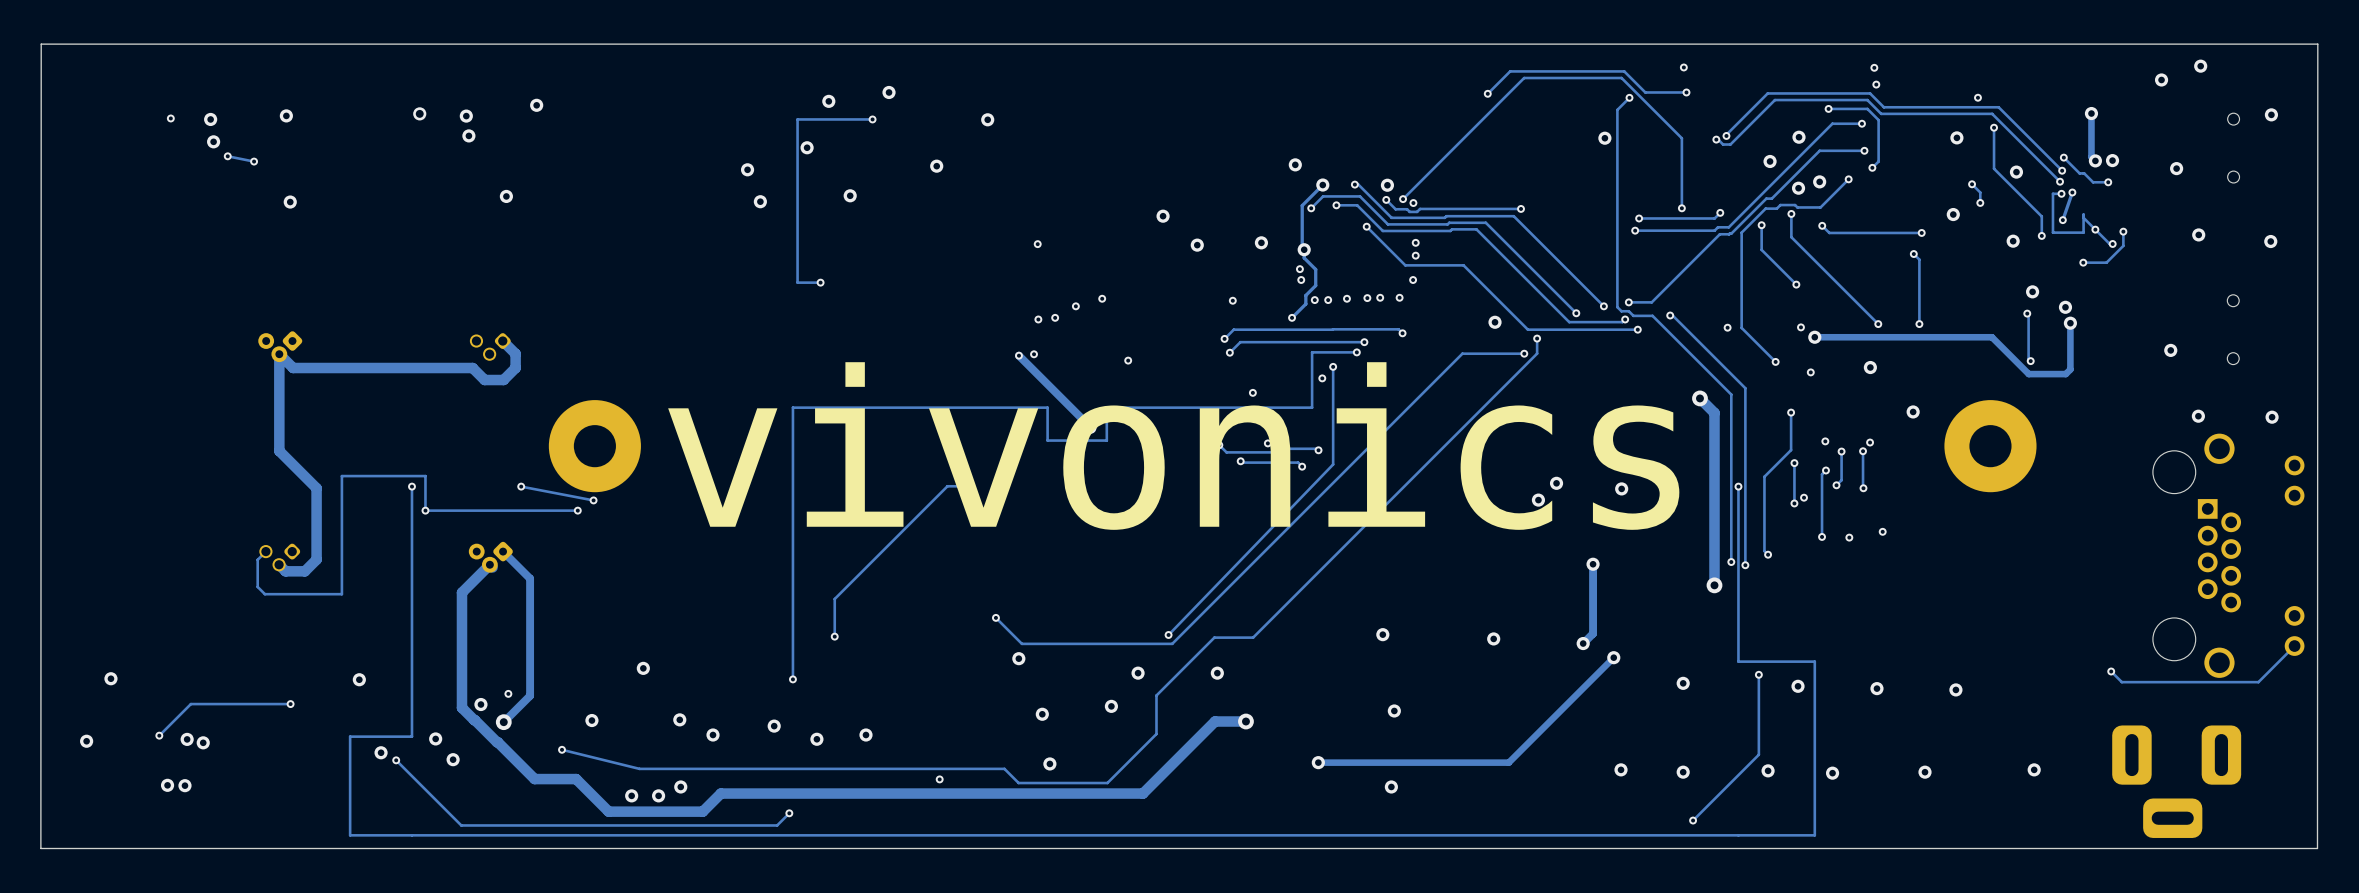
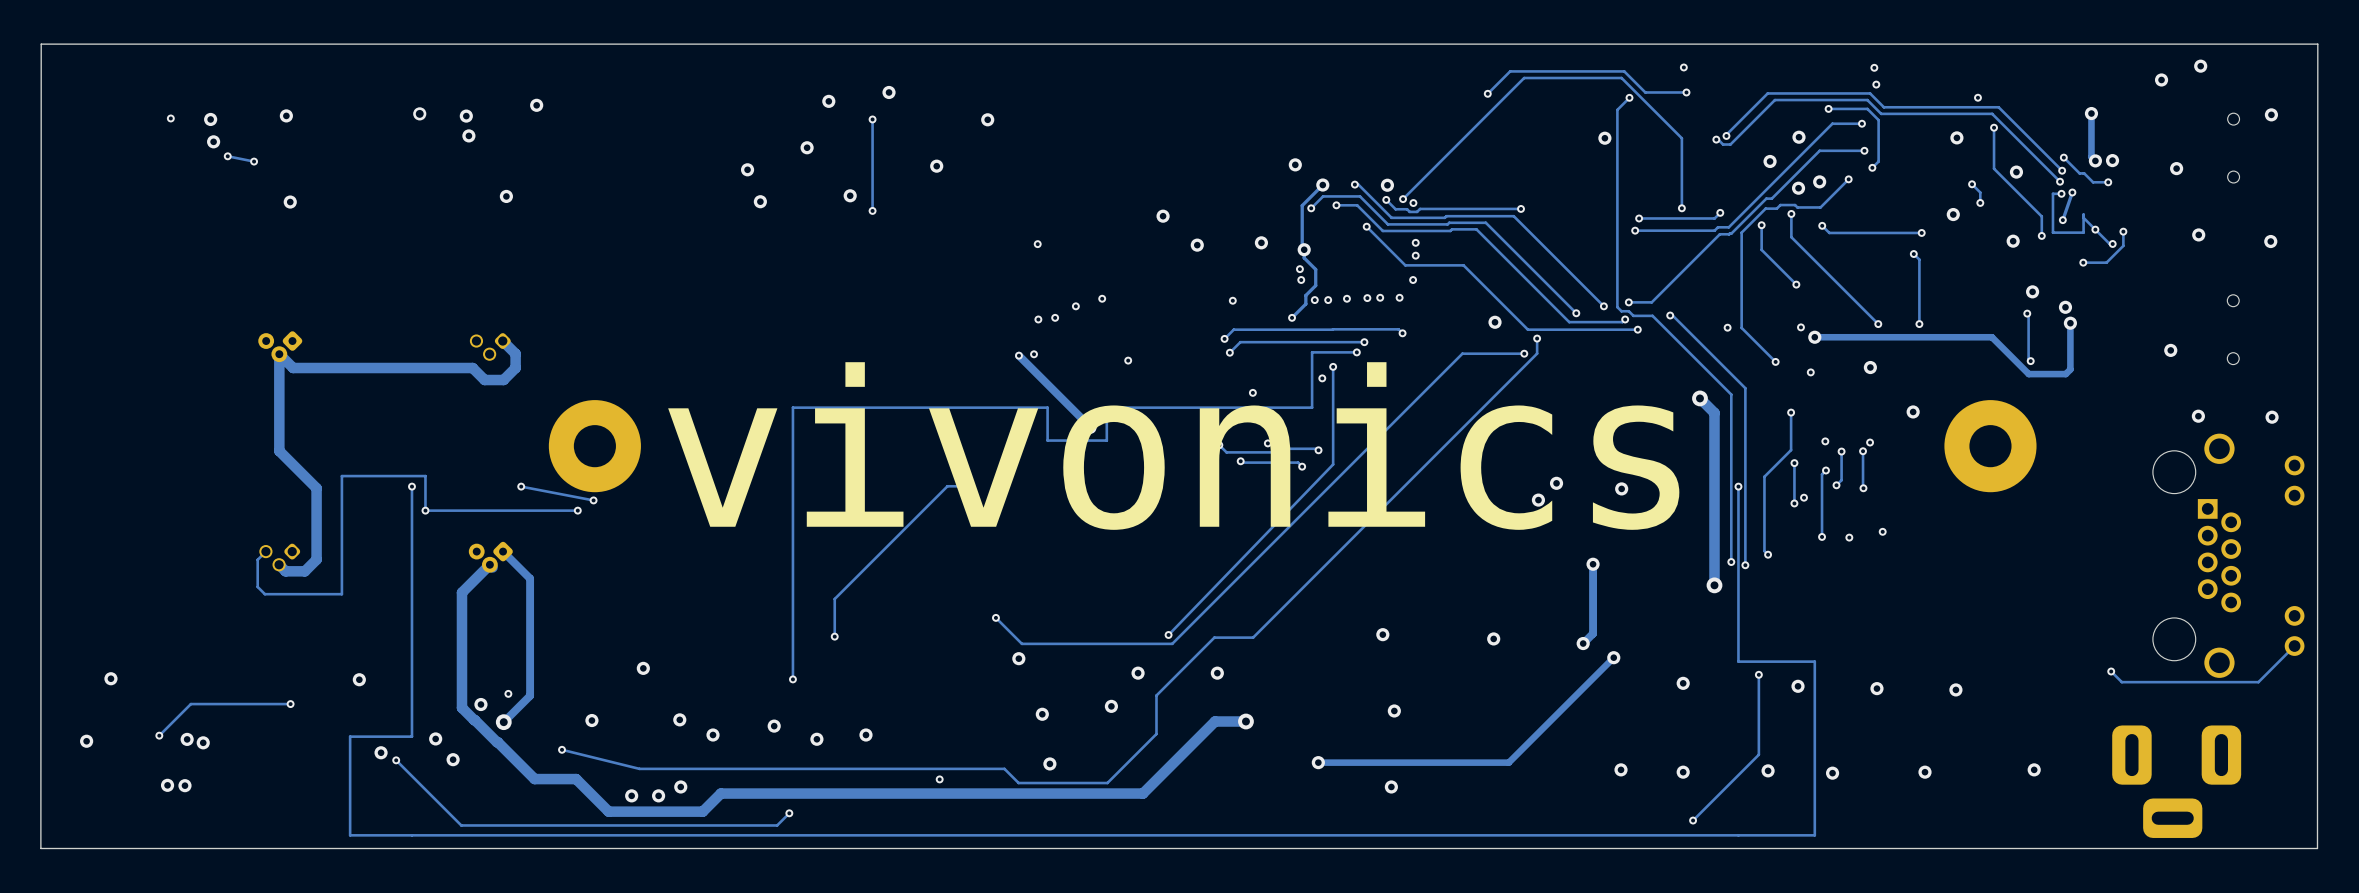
track: (872, 119) (797, 119) (797, 282) (820, 282) -> (872, 119) (872, 210)
via: none -> (872, 210)
via: (820, 282) -> none

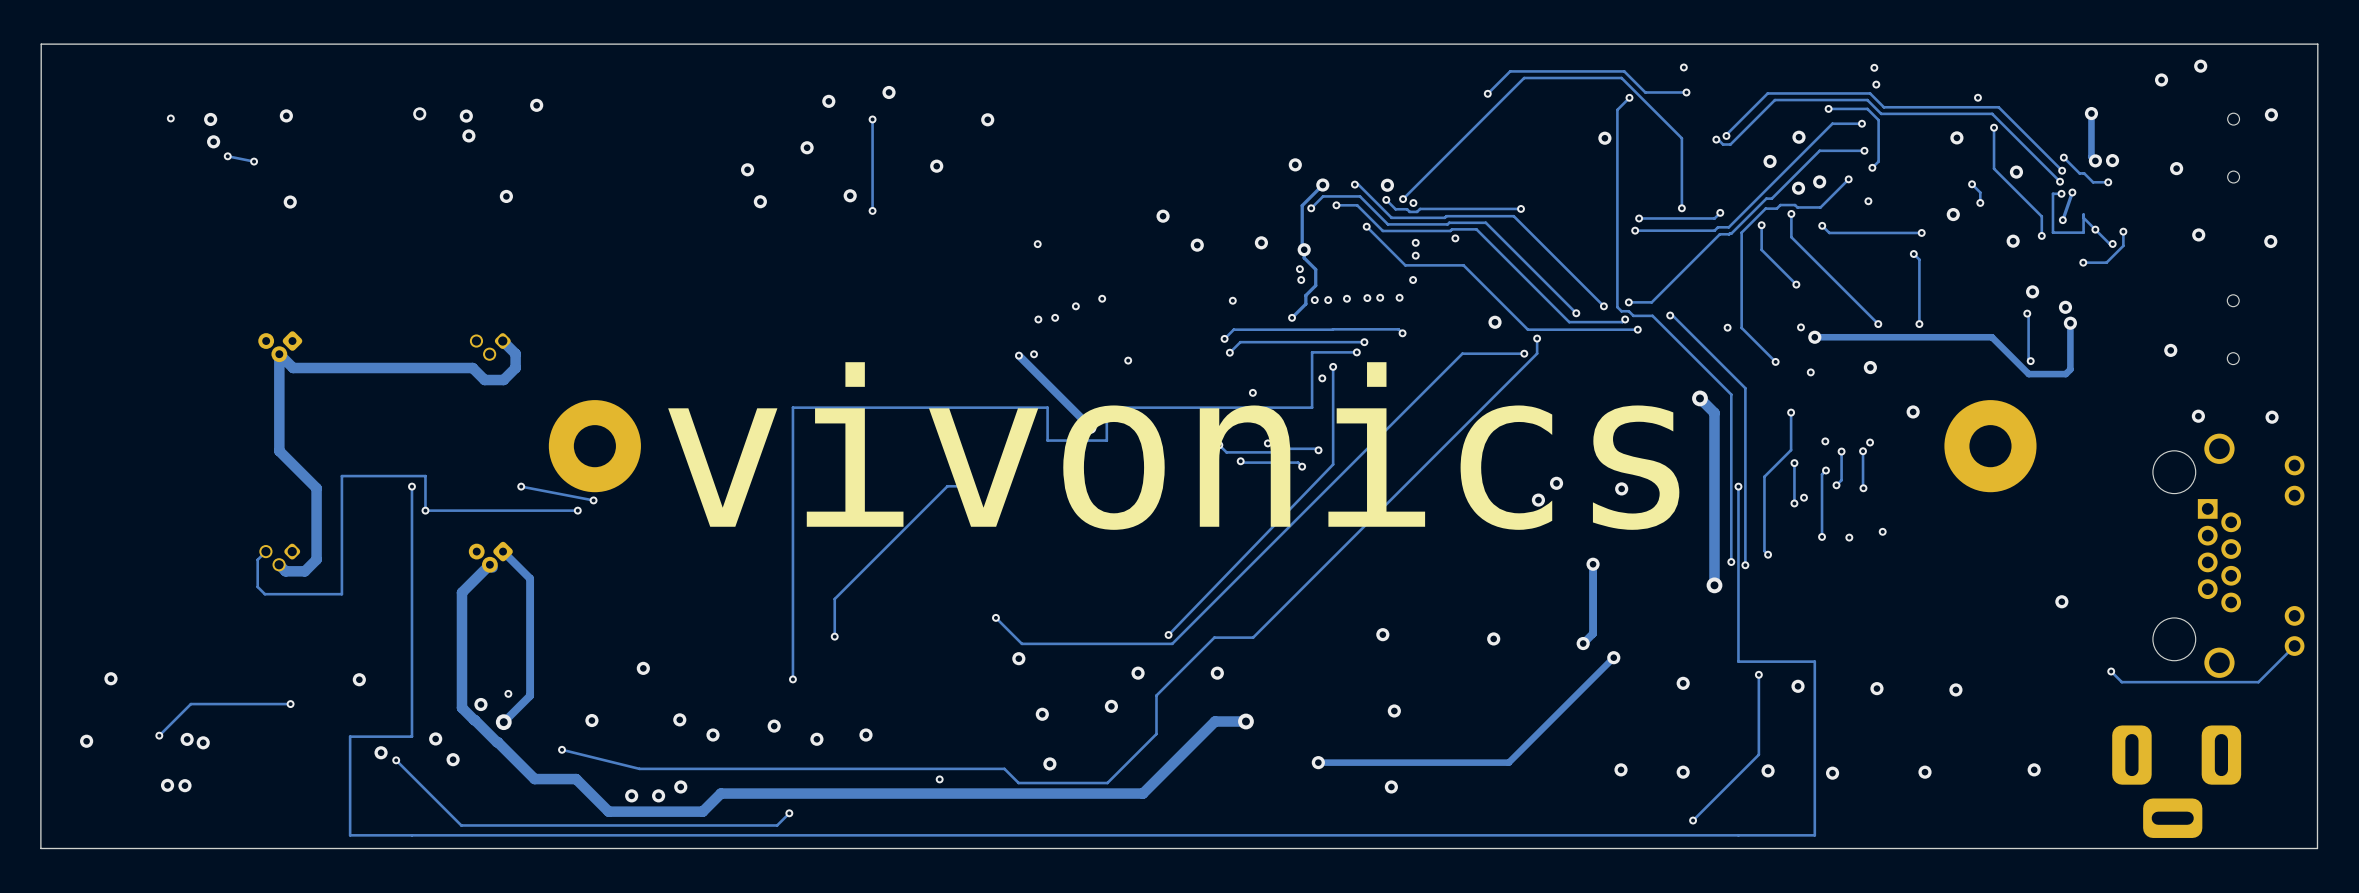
via: none -> (1868, 201)
via: none -> (1455, 238)
via: none -> (2061, 601)

